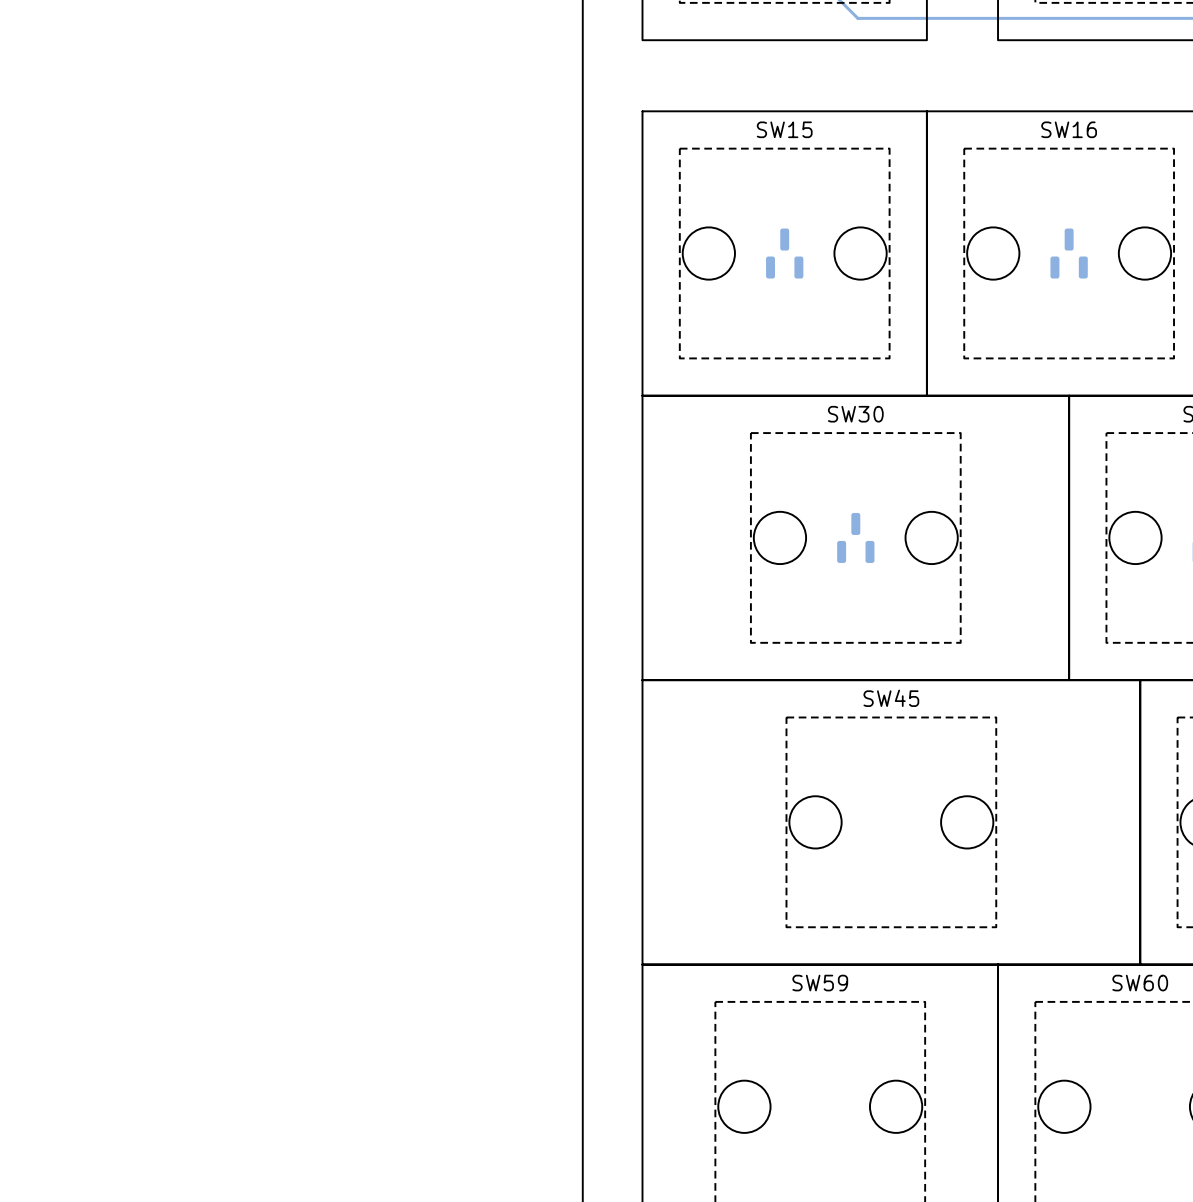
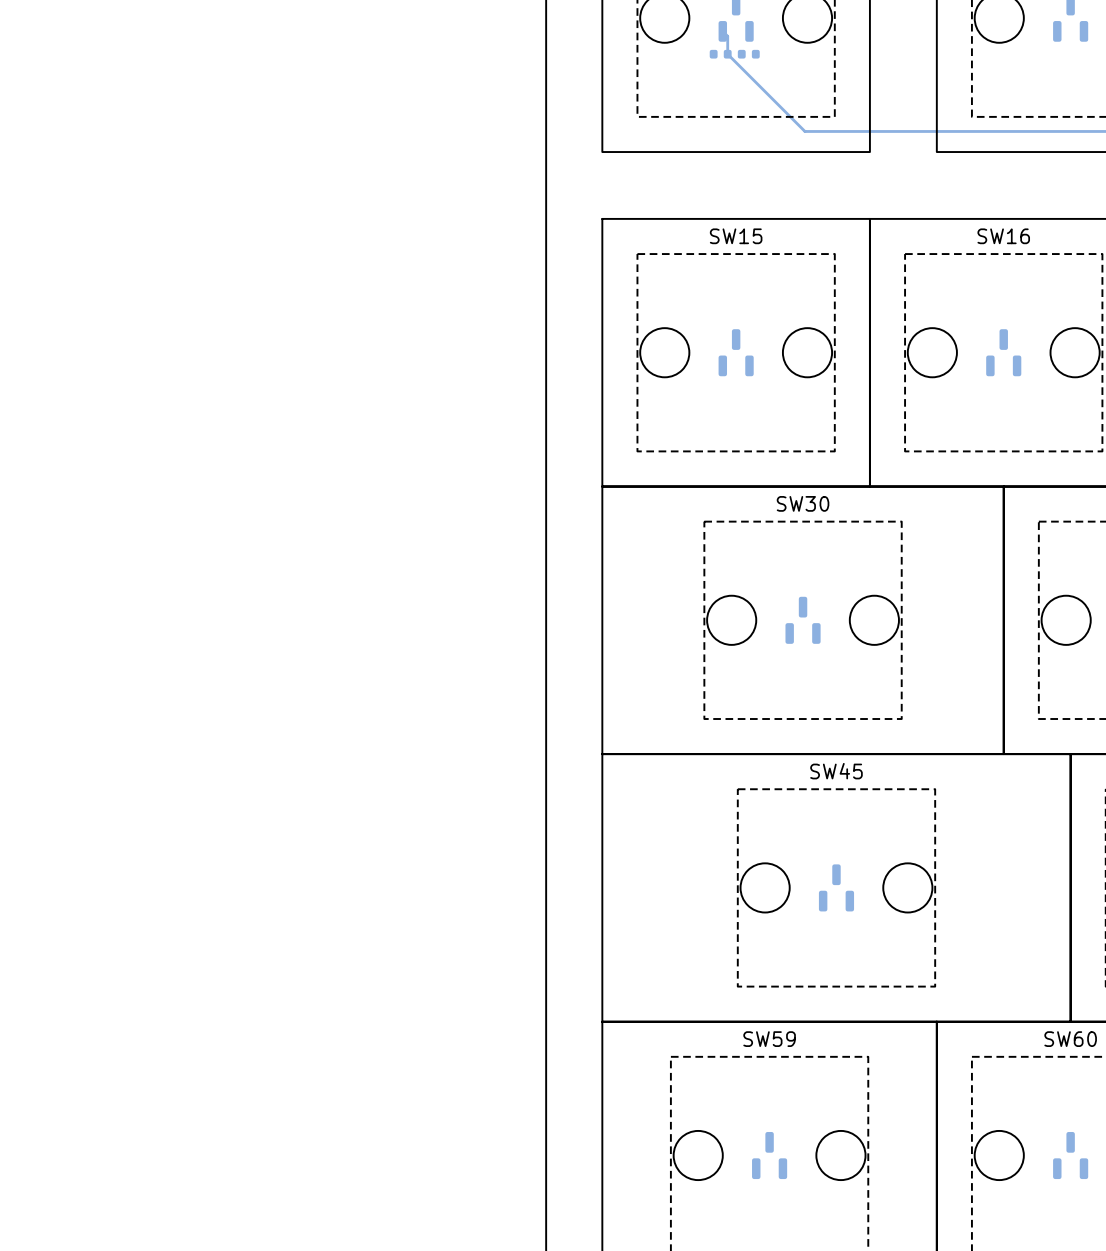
part: none -> (836, 887)
part: none -> (769, 1155)
part: none -> (1070, 1155)

